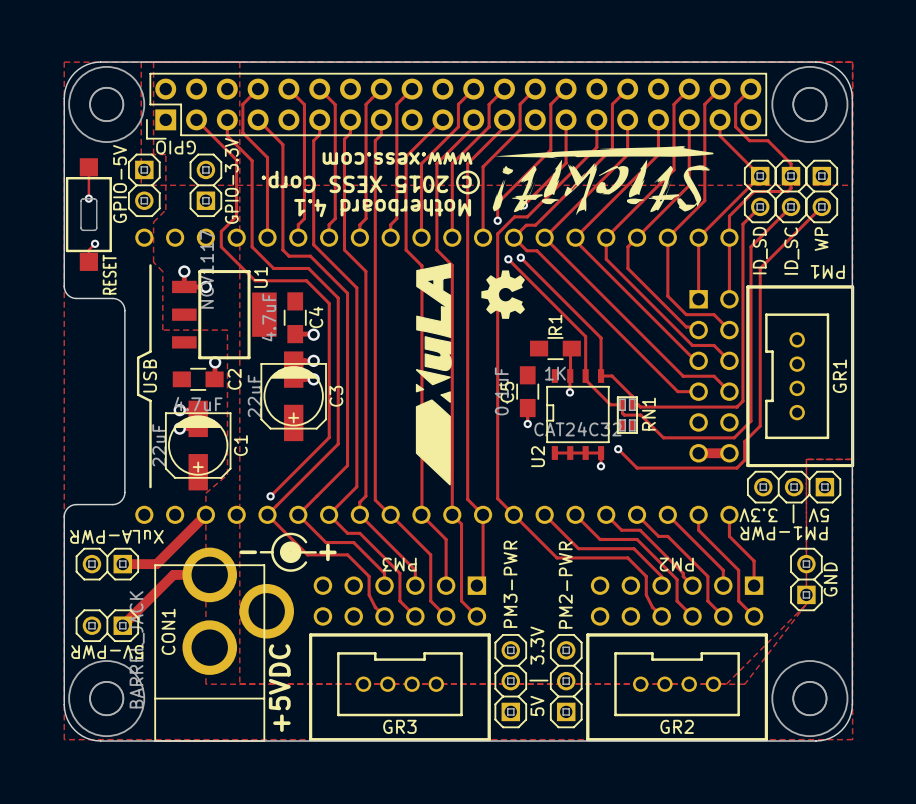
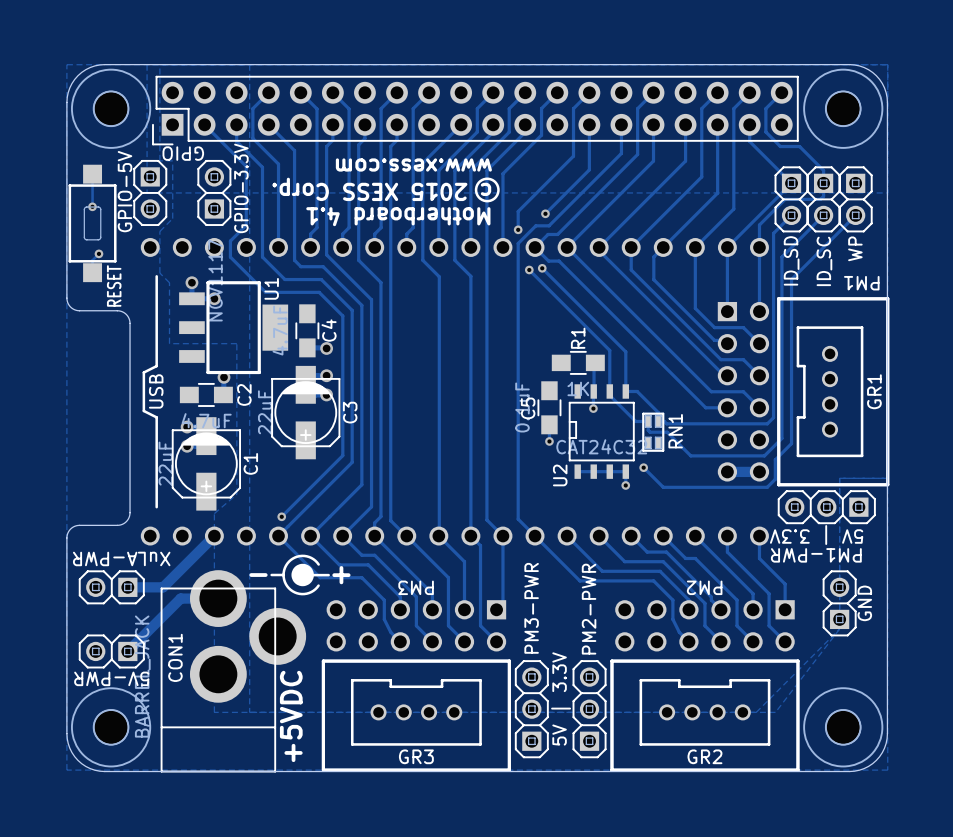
drawing: [492, 146, 714, 216] -> none
drawing: [415, 262, 452, 486] -> none
drawing: [481, 270, 525, 319] -> none

